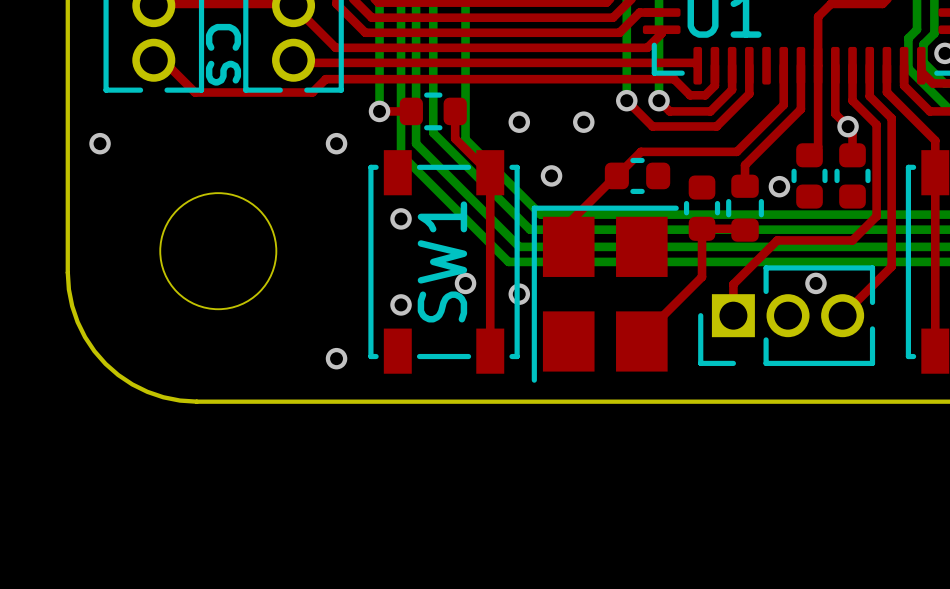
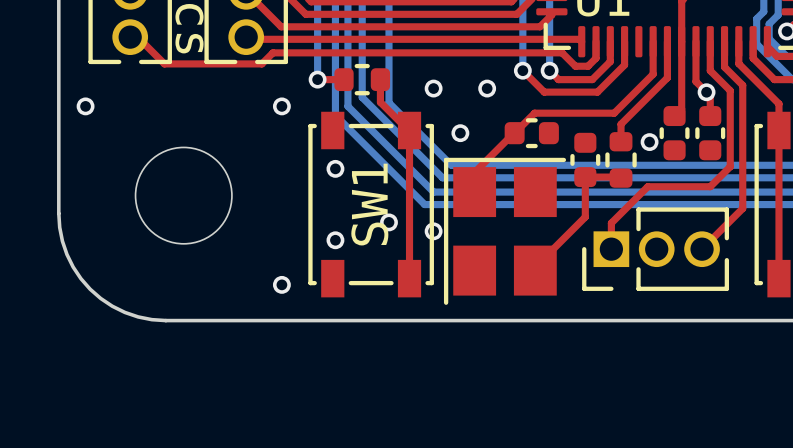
via: (815, 283) -> none

